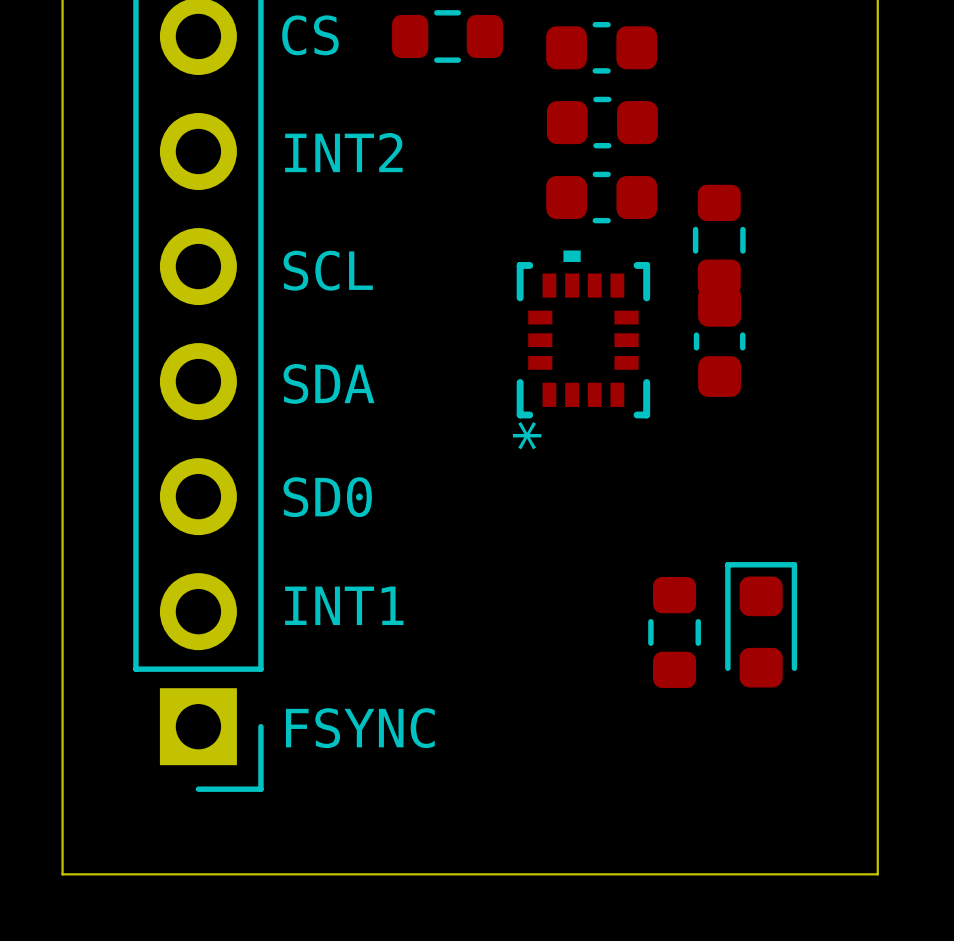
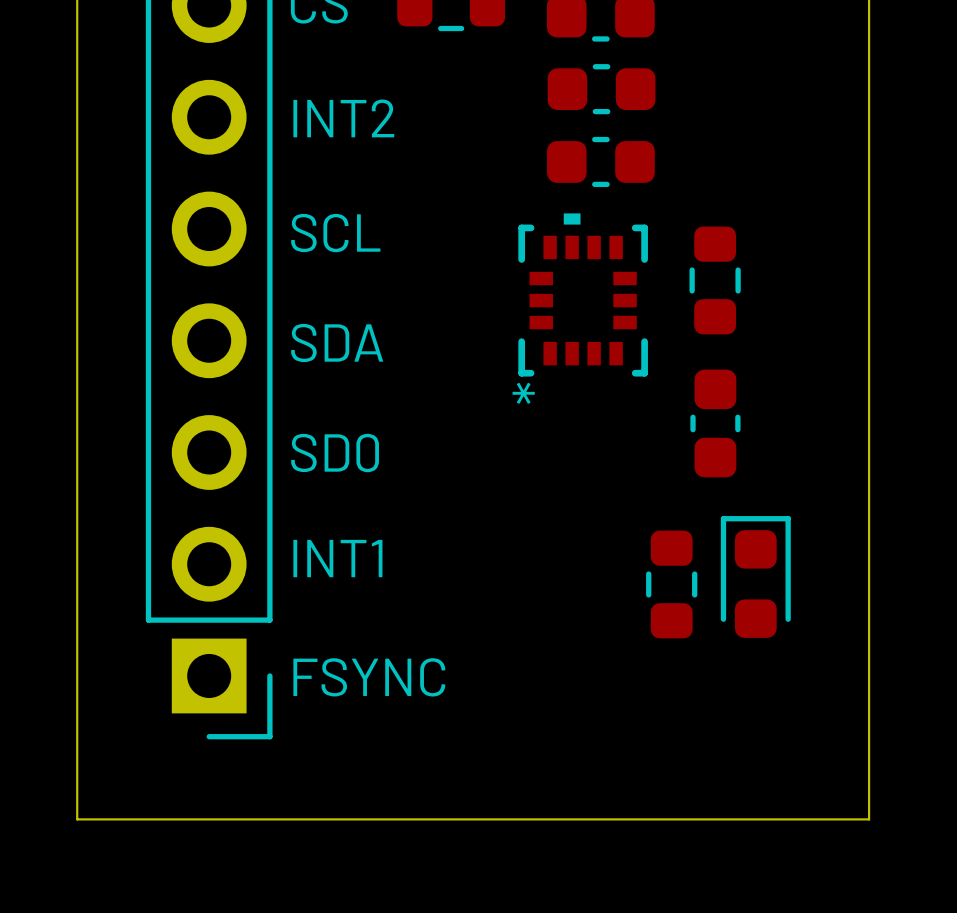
part: (719, 240) -> none
part footprint: [693, 285, 746, 397] -> [689, 226, 741, 335]
part: none -> (715, 423)

